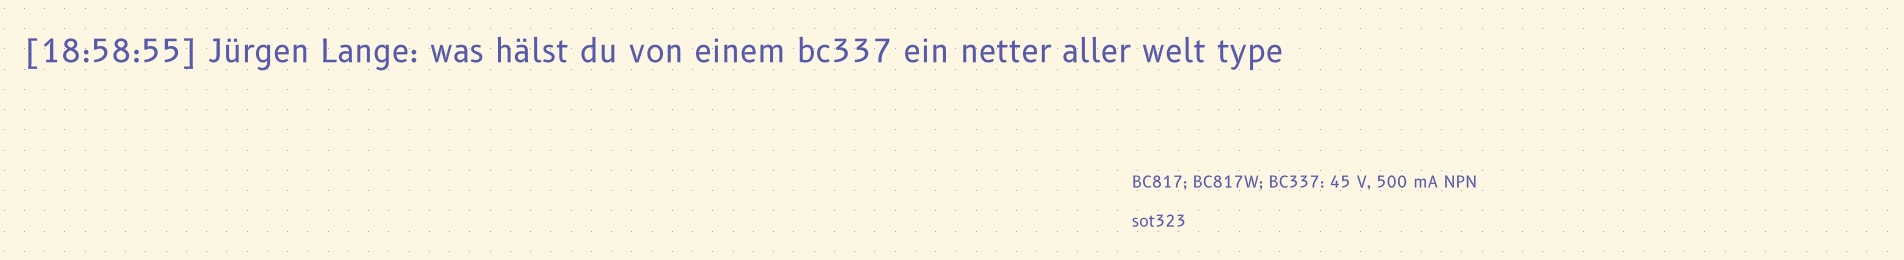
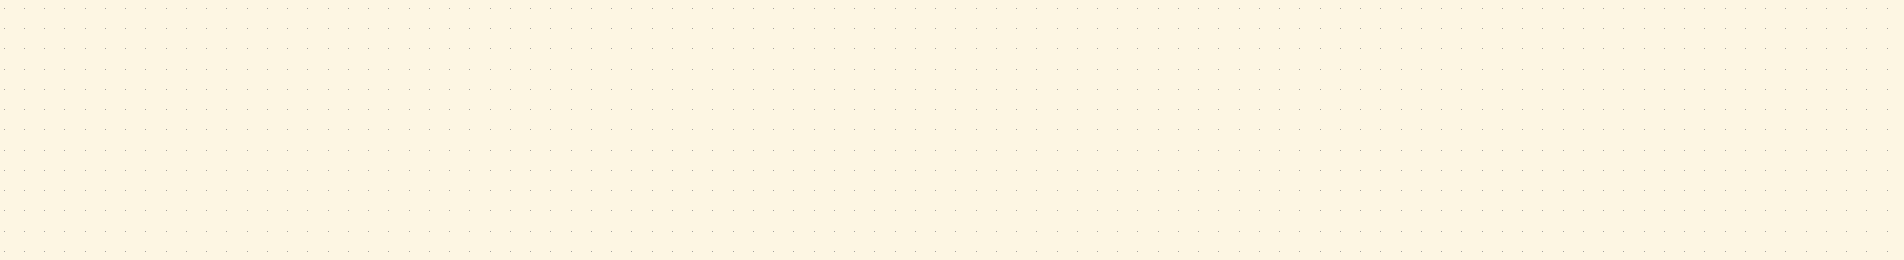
text: [18:58:55] Jürgen Lange: was hälst du von einem bc337 ein netter aller welt type (654, 53) -> none
text: BC817; BC817W; BC337: 45 V, 500 mA NPN (1304, 182) -> none
text: sot323 (1158, 220) -> none

